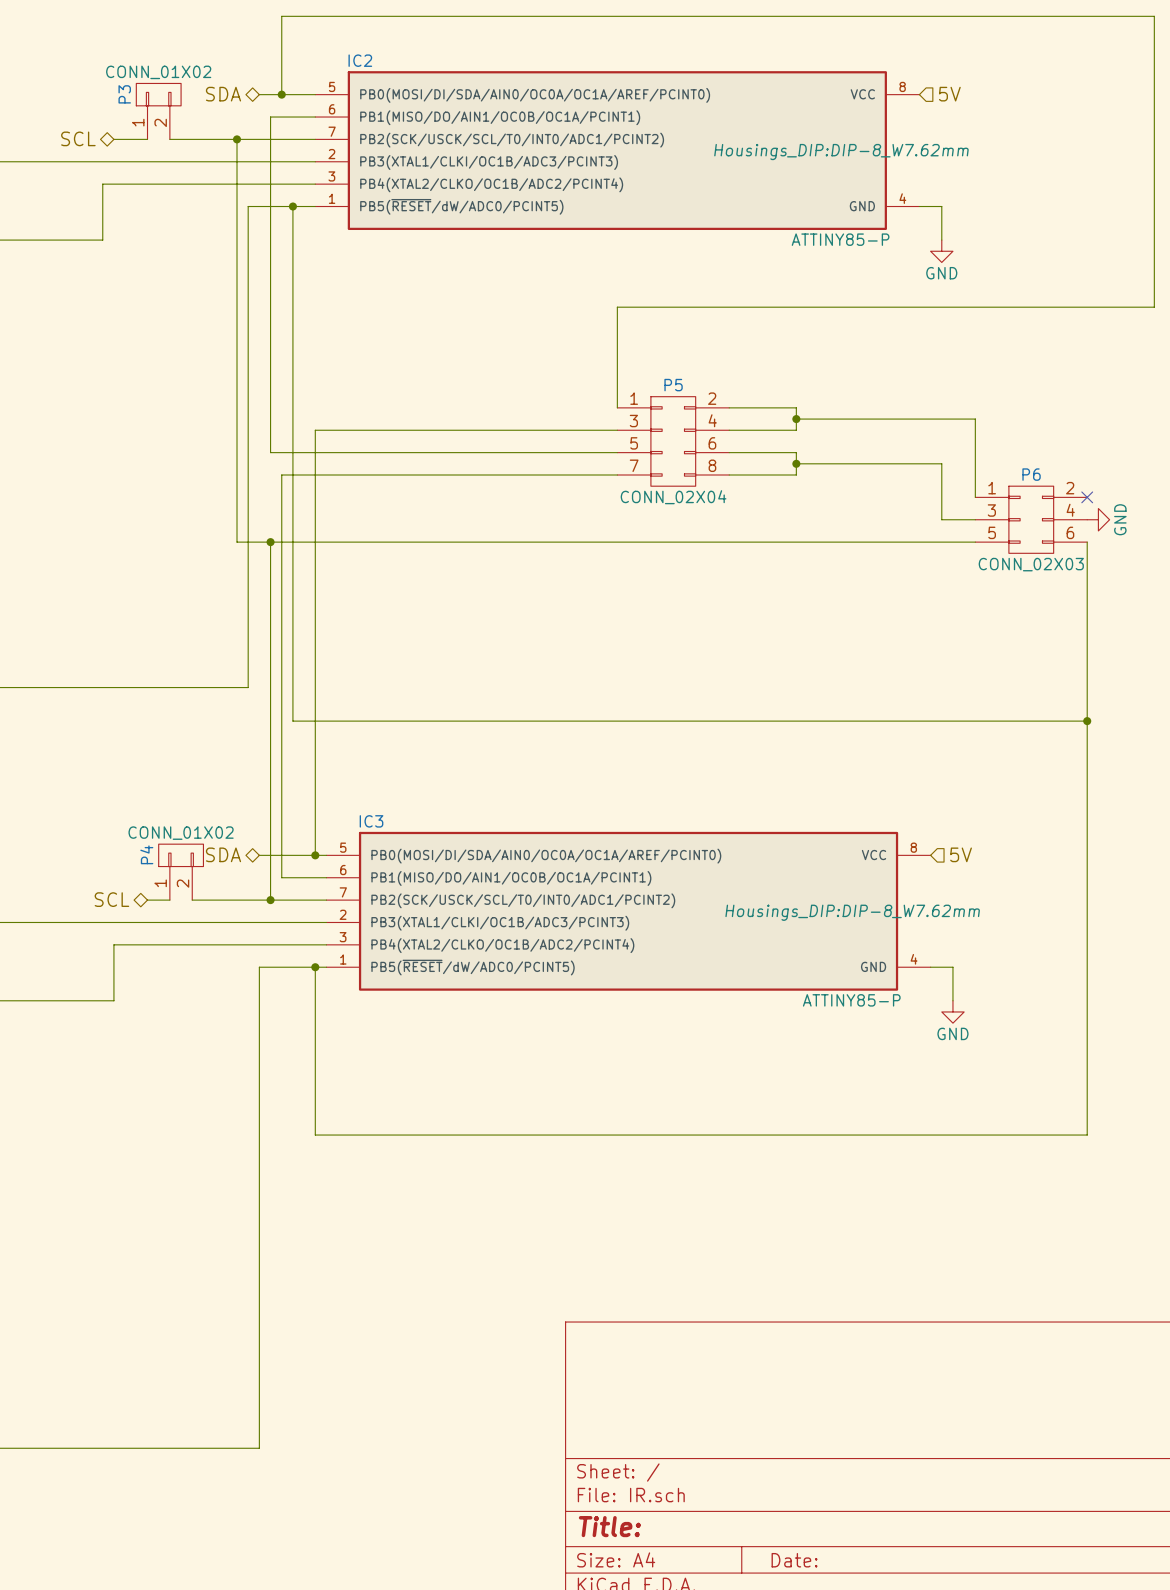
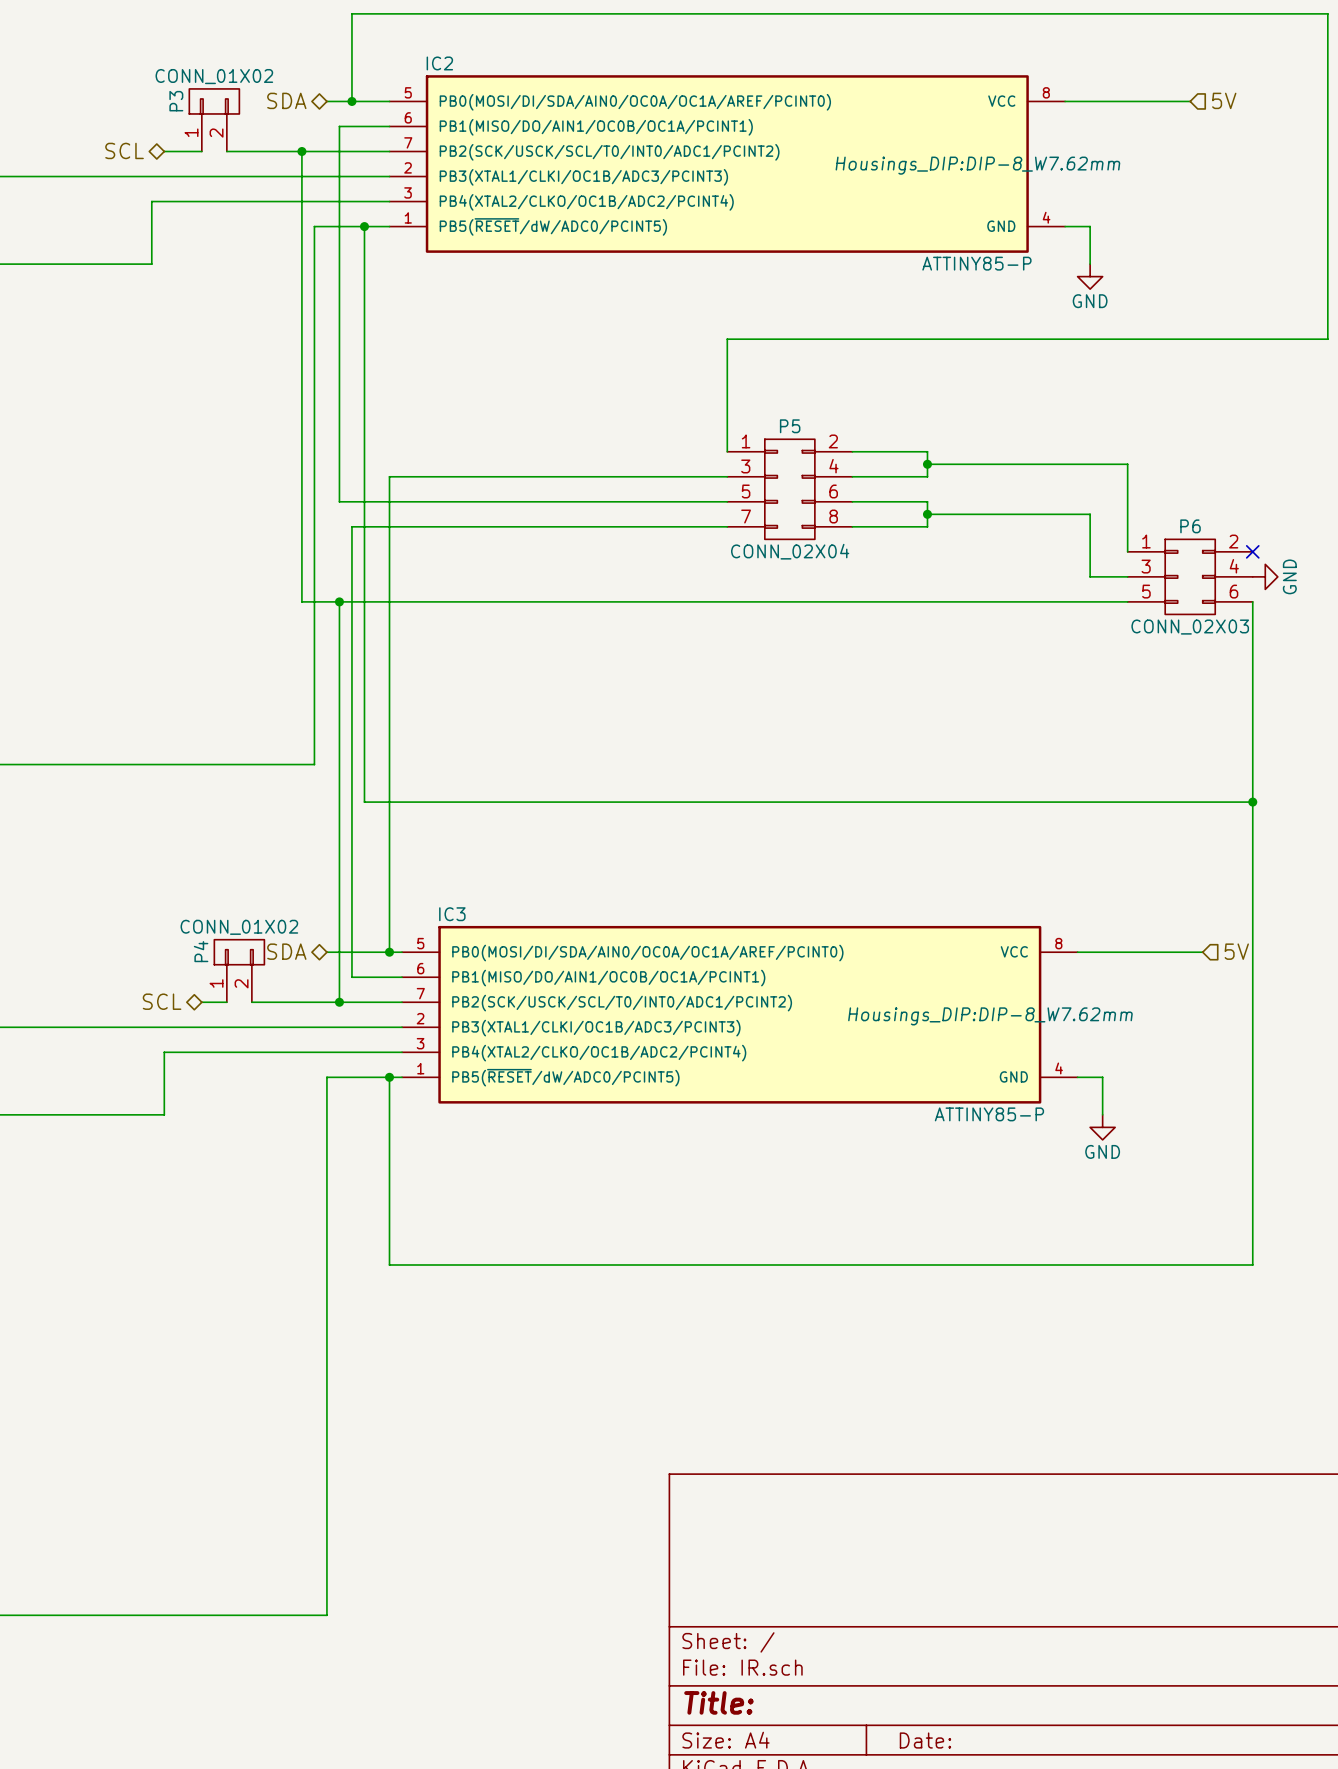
wire: none -> (1065, 101) (1190, 101)
hierarchical label position: 5V (949, 94) -> 5V (1224, 100)
hierarchical label position: 5V (961, 854) -> 5V (1236, 951)
wire: none -> (1077, 952) (1202, 952)

